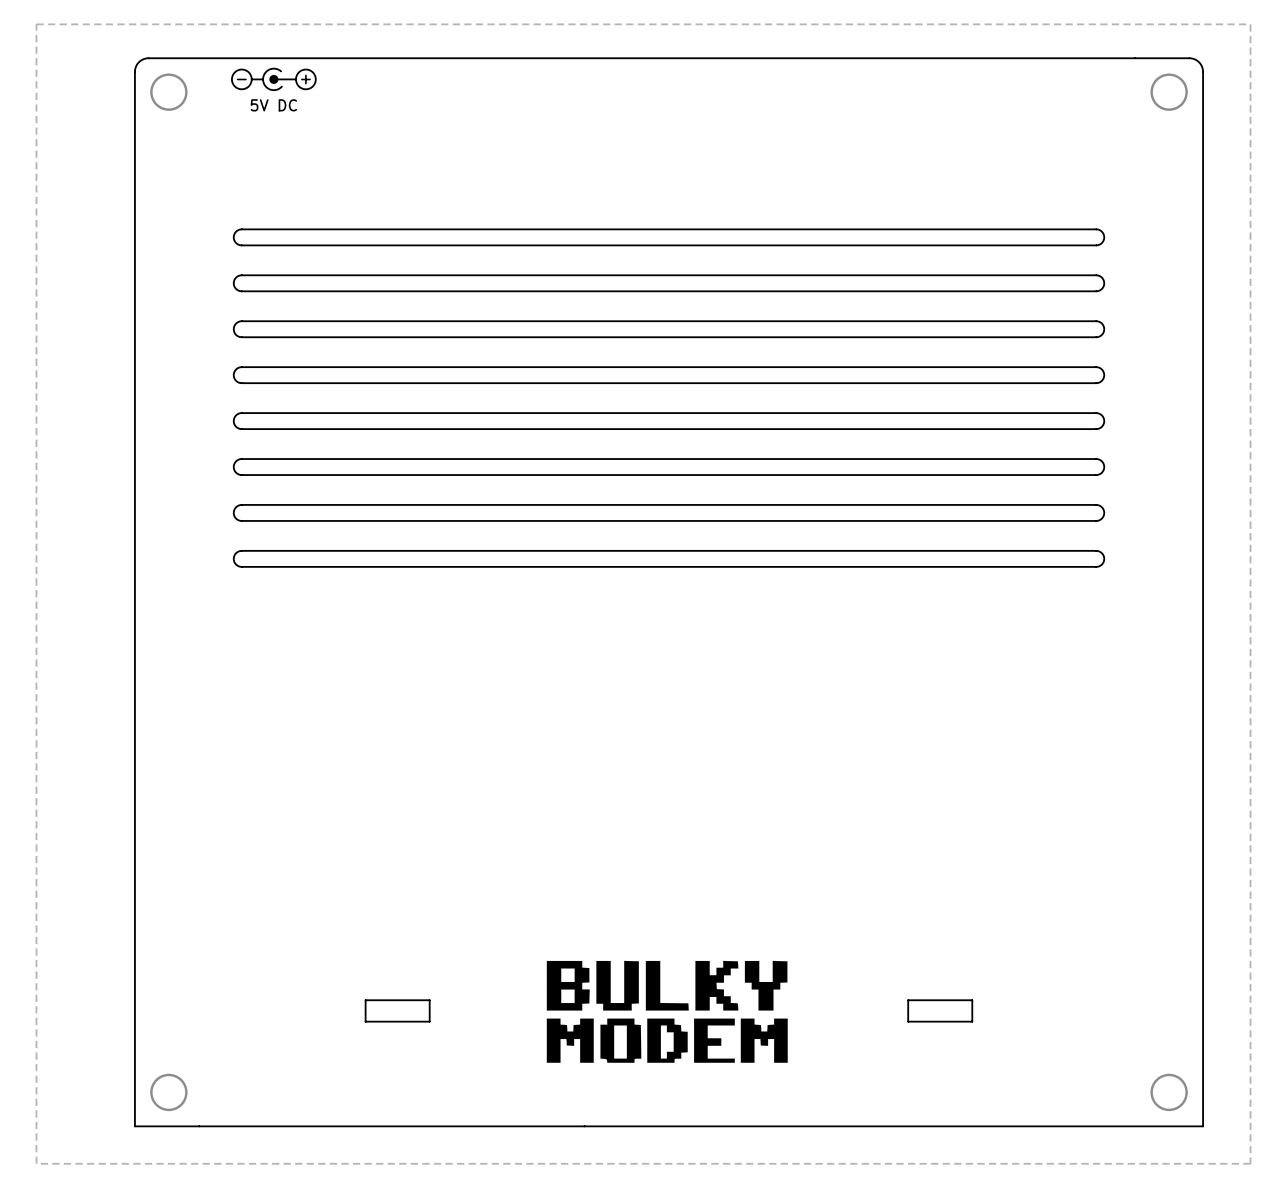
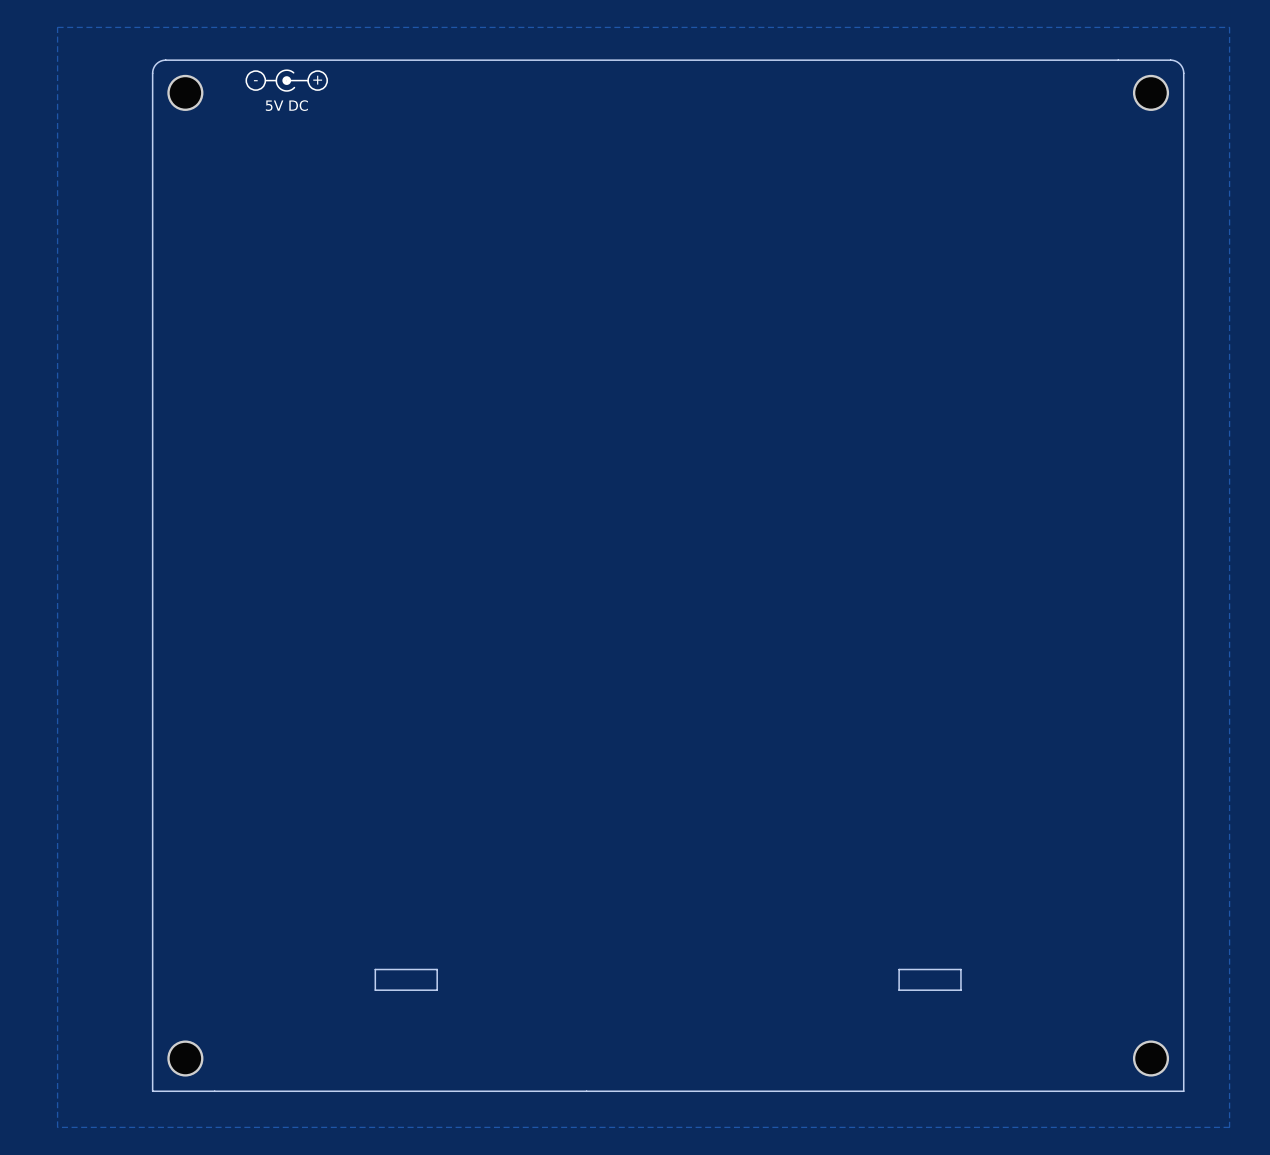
board edge: (241, 229) (1096, 229) (1101, 231) (1104, 237) (1101, 243) (1096, 245) (241, 245) (236, 243) (233, 237) (236, 231) (241, 229) -> none
board edge: (241, 275) (1096, 275) (1101, 277) (1104, 283) (1101, 288) (1096, 291) (241, 291) (236, 288) (233, 283) (236, 277) (241, 275) -> none
board edge: (241, 321) (1096, 321) (1101, 323) (1104, 329) (1101, 334) (1096, 337) (241, 337) (236, 334) (233, 329) (236, 323) (241, 321) -> none
board edge: (241, 367) (1096, 367) (1101, 369) (1104, 375) (1101, 380) (1096, 383) (241, 383) (236, 380) (233, 375) (236, 369) (241, 367) -> none
board edge: (241, 413) (1096, 413) (1101, 415) (1104, 421) (1101, 426) (1096, 429) (241, 429) (236, 426) (233, 421) (236, 415) (241, 413) -> none
board edge: (241, 459) (1096, 459) (1101, 461) (1104, 467) (1101, 472) (1096, 475) (241, 475) (236, 472) (233, 467) (236, 461) (241, 459) -> none
board edge: (241, 504) (1096, 504) (1101, 507) (1104, 512) (1101, 518) (1096, 520) (241, 520) (236, 518) (233, 512) (236, 507) (241, 504) -> none
board edge: (241, 550) (1096, 550) (1101, 553) (1104, 558) (1101, 564) (1096, 566) (241, 566) (236, 564) (233, 558) (236, 553) (241, 550) -> none
drawing: [546, 960, 788, 1063] -> none

